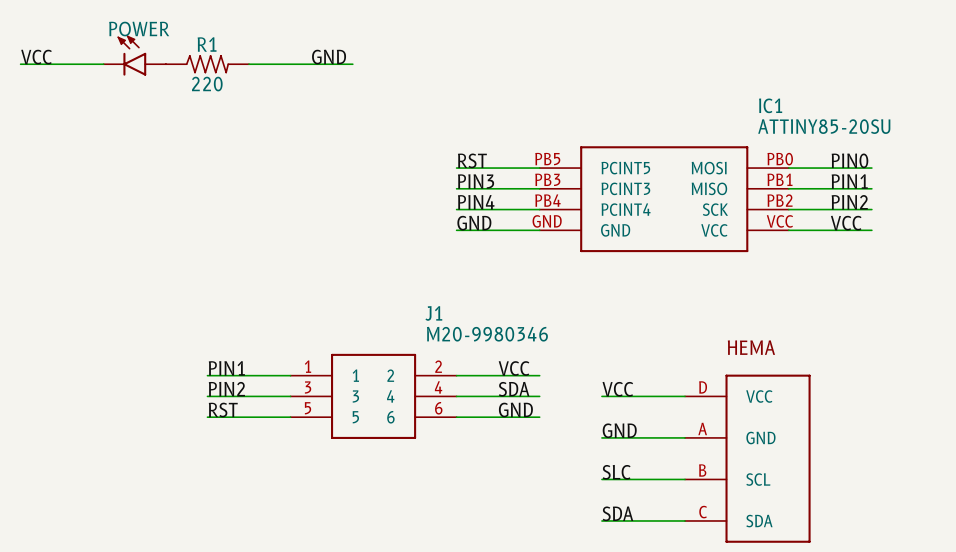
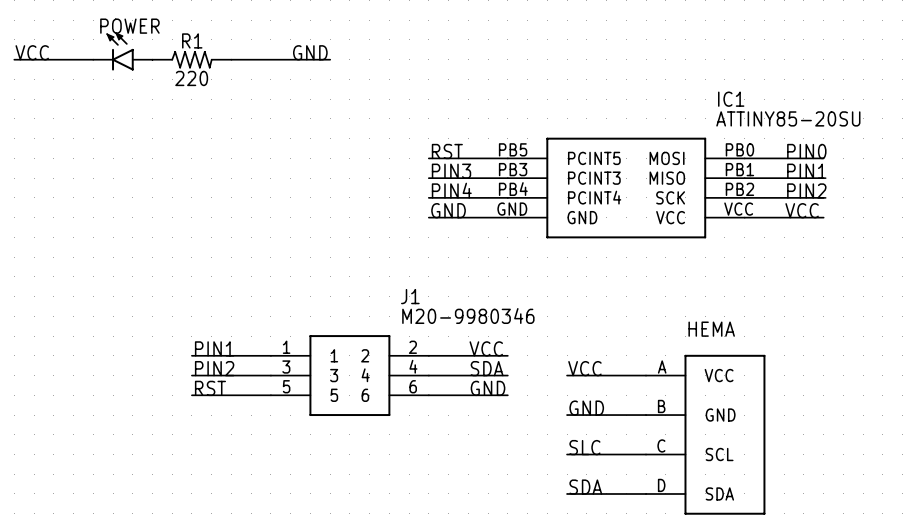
part pin number: D (703, 387) -> A (662, 367)
part pin number: A (702, 428) -> B (661, 406)
part pin number: B (702, 470) -> C (661, 445)
part pin number: C (703, 512) -> D (661, 485)

